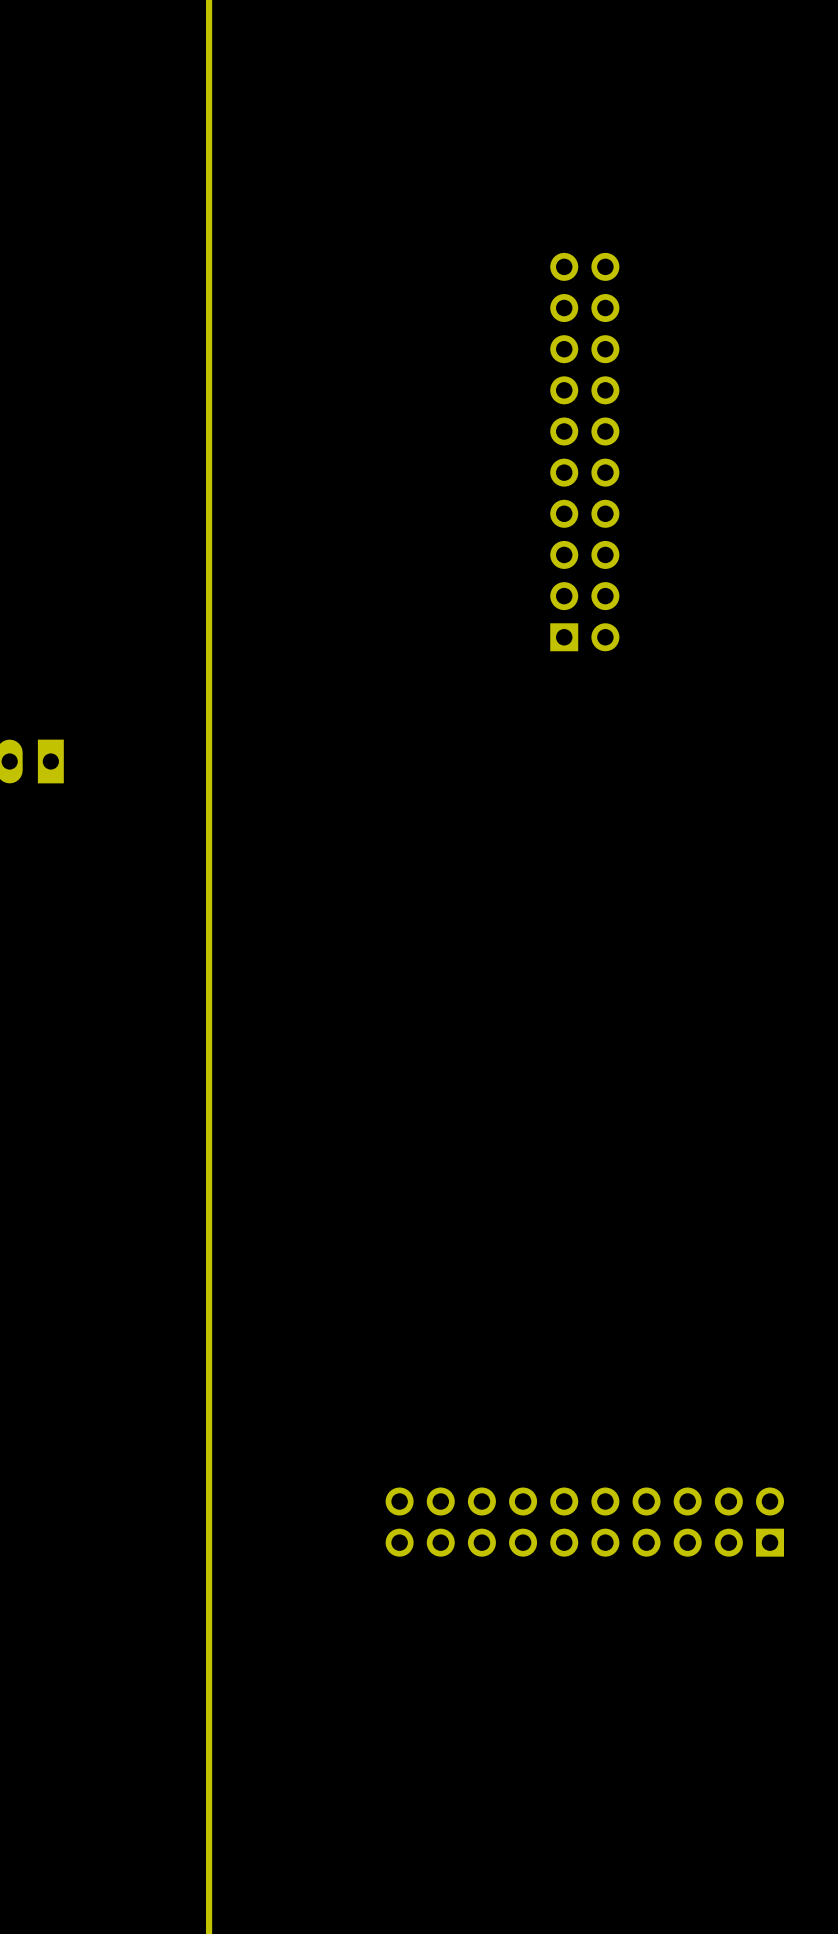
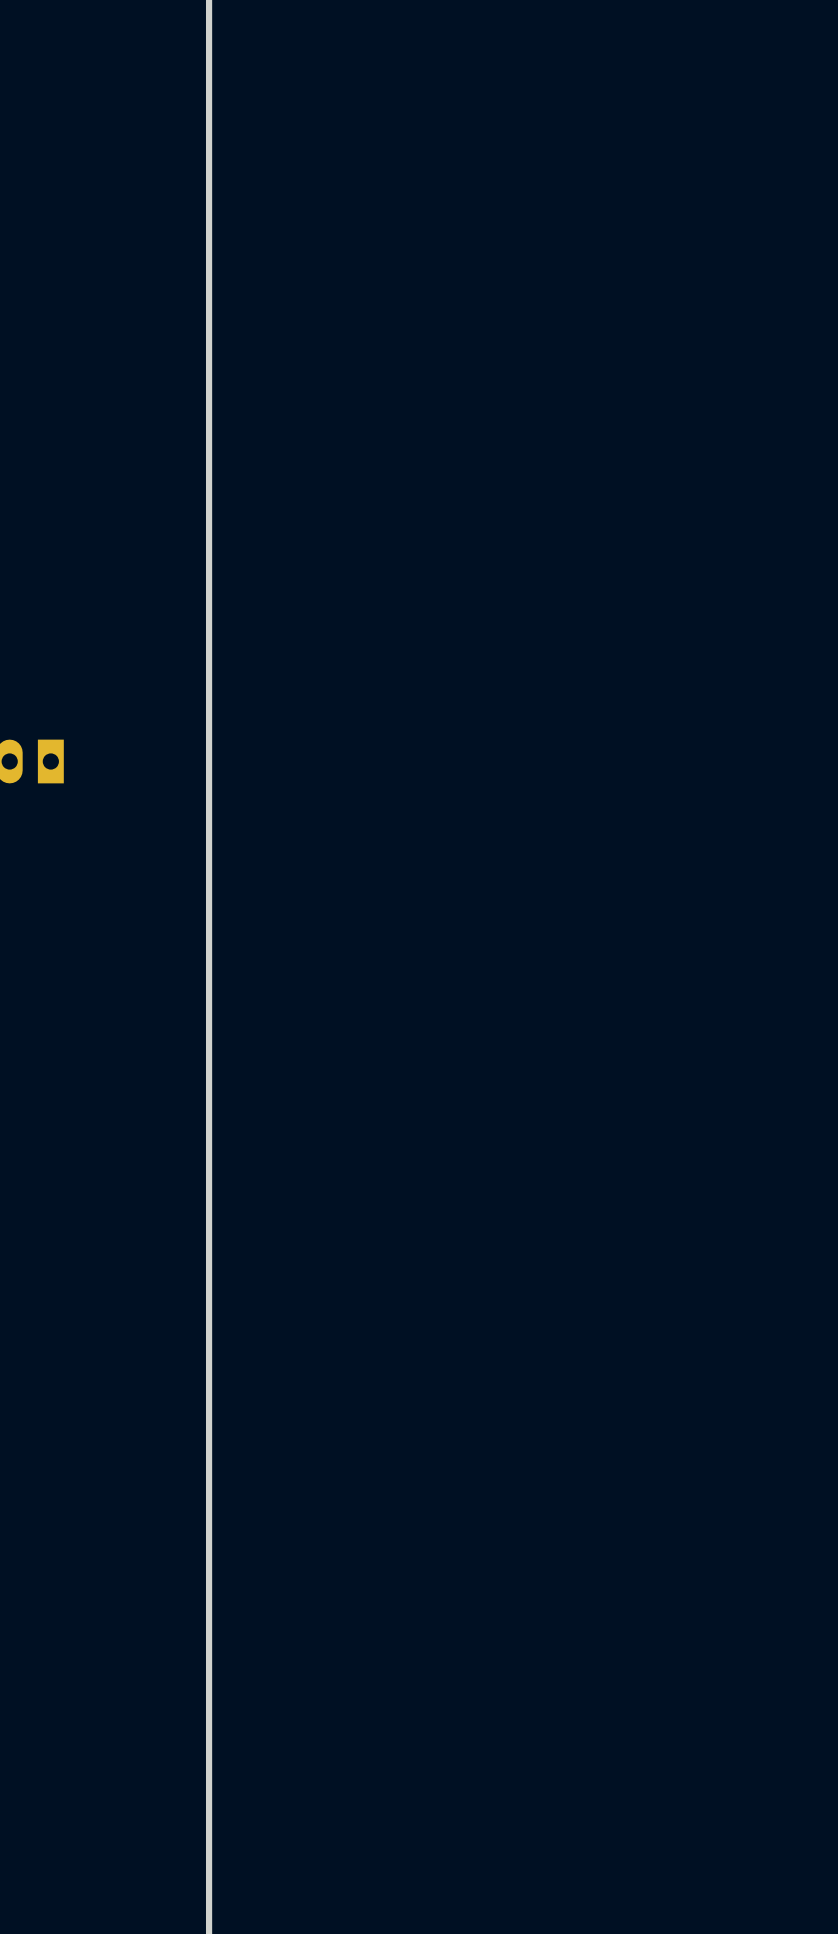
part: (584, 452) -> none
part: (584, 1522) -> none

